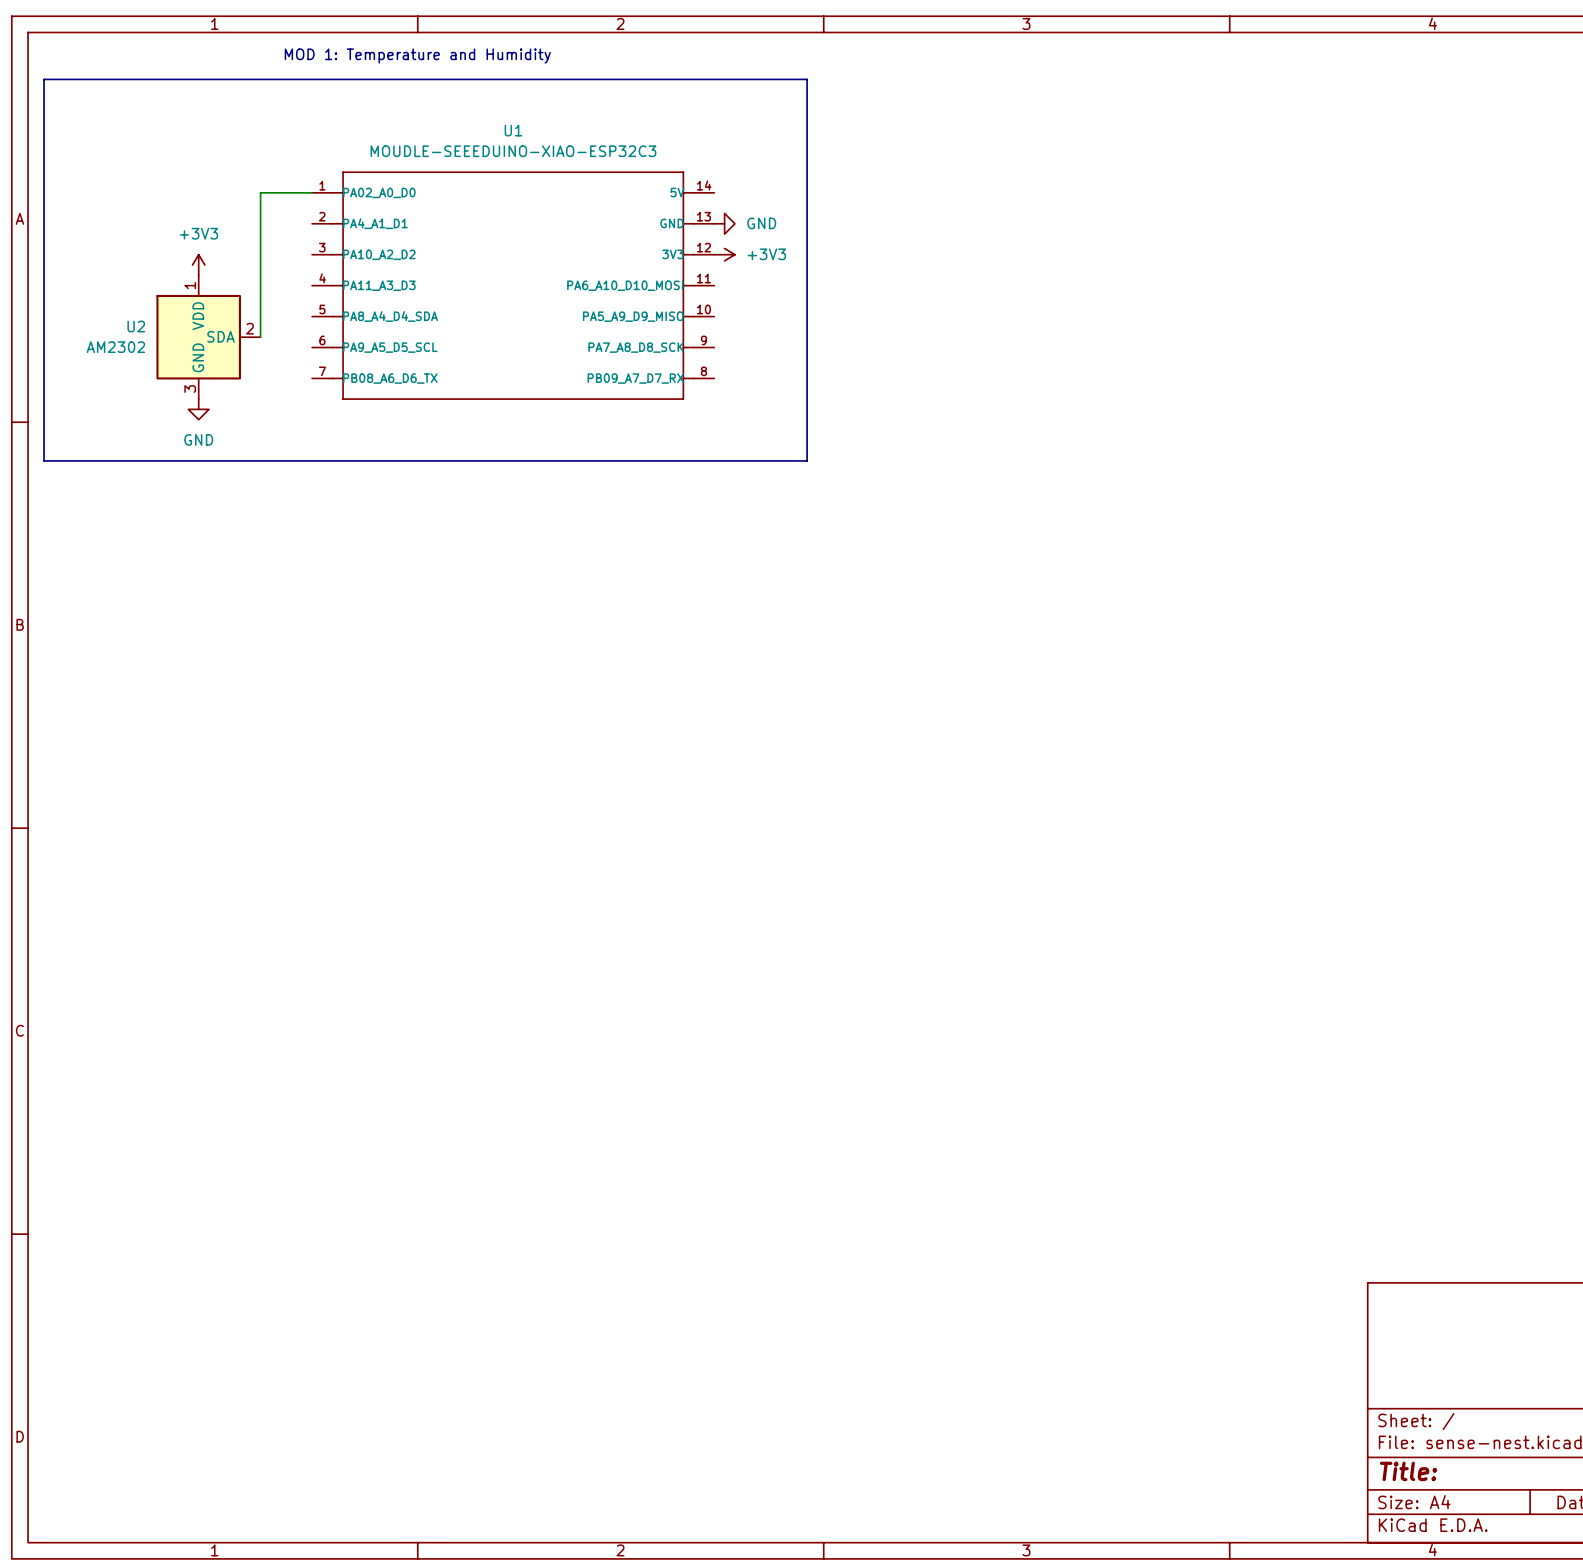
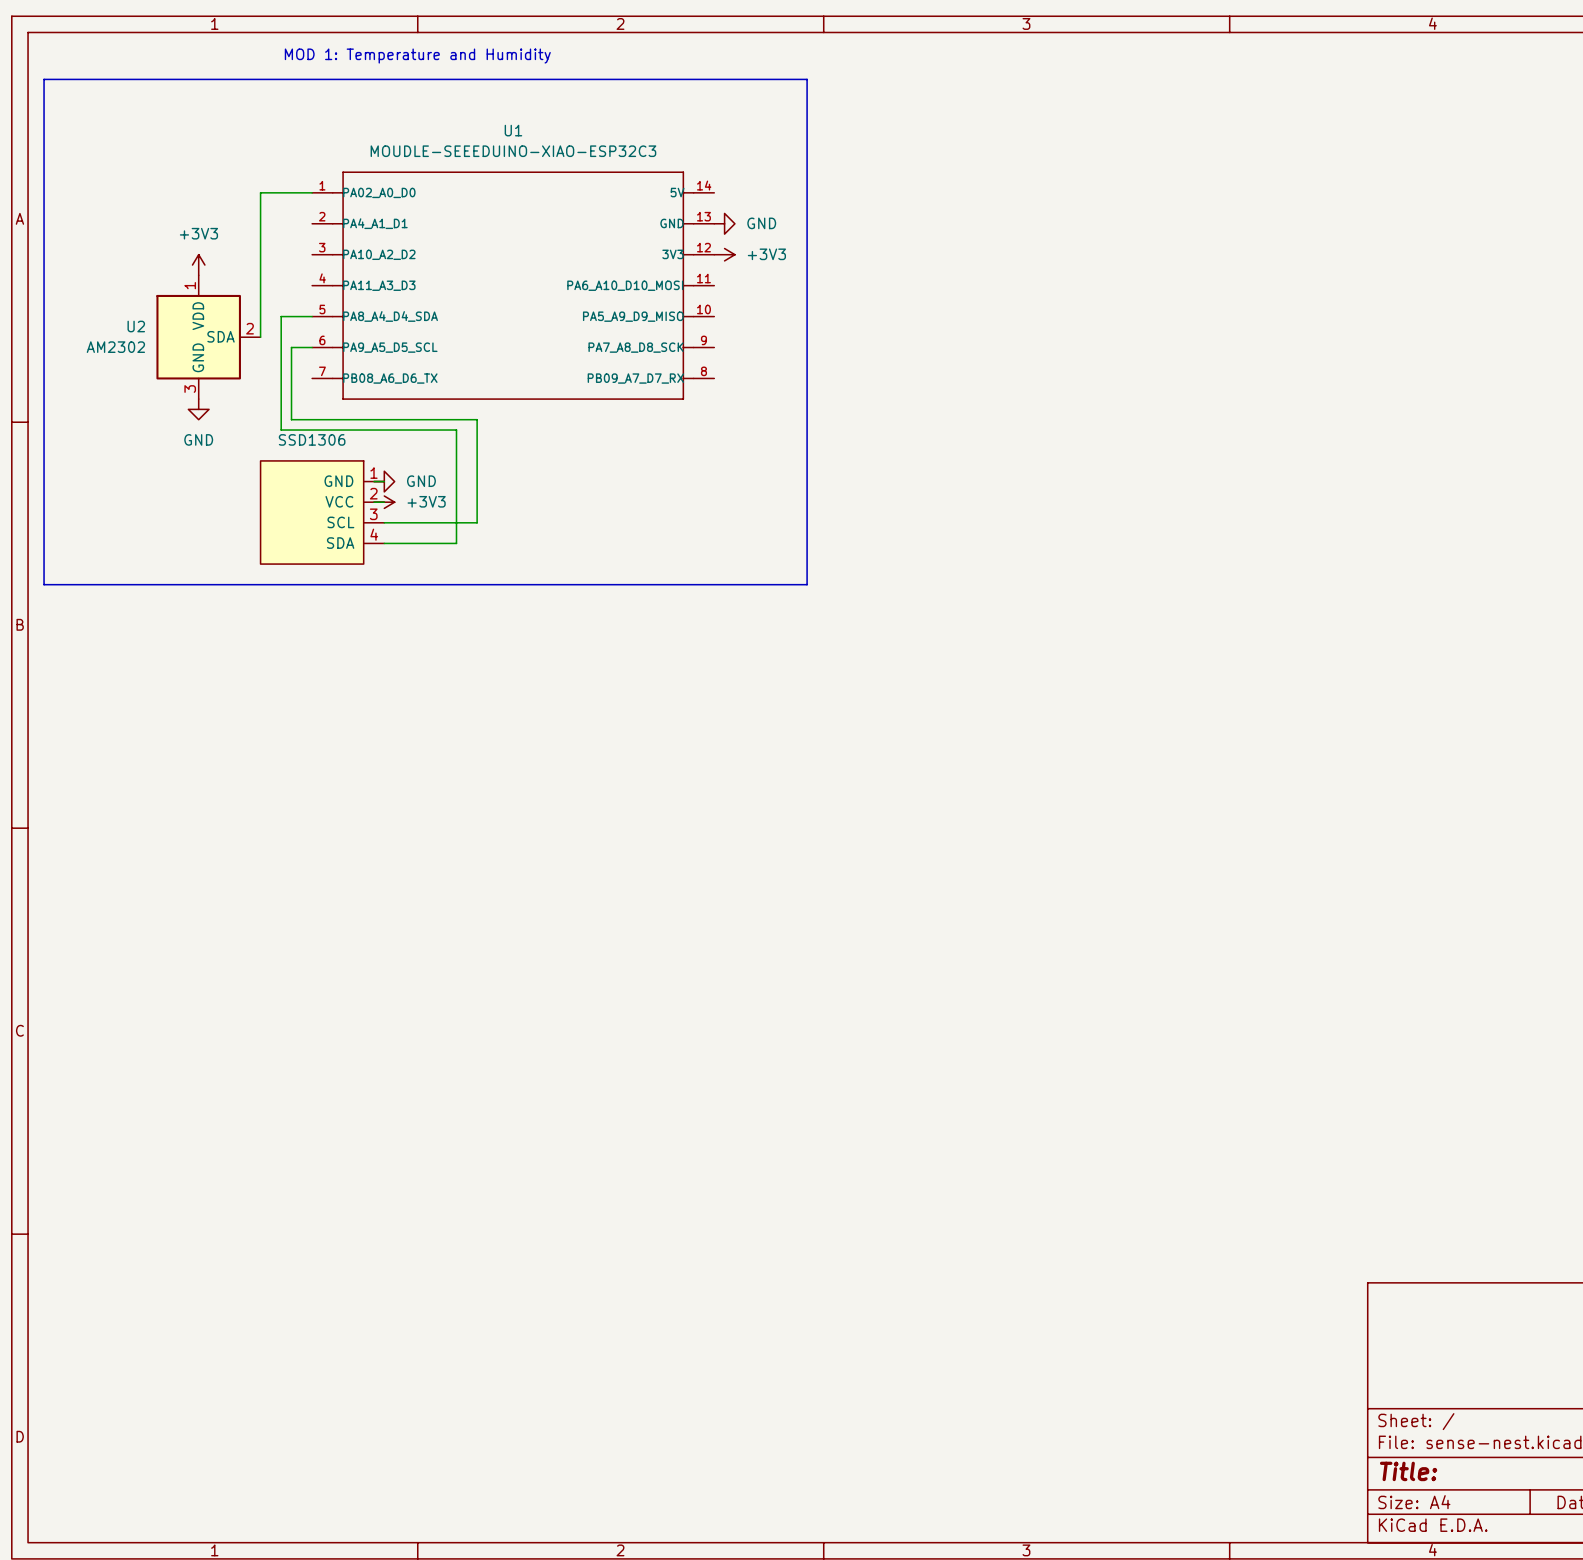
wire: none -> (312, 316) (281, 316) (281, 430) (456, 430) (456, 543) (384, 543)
wire: none -> (312, 347) (291, 347) (291, 419) (477, 419) (477, 522) (384, 522)
line: (44, 460) (807, 460) -> (44, 460) (44, 584) (807, 584) (807, 460)
wire: none -> (374, 481) (384, 481)
power symbol: none -> GND (384, 481)
wire: none -> (374, 502) (384, 502)
power symbol: none -> +3V3 (384, 502)
part: none -> SSD1306 (322, 512)

